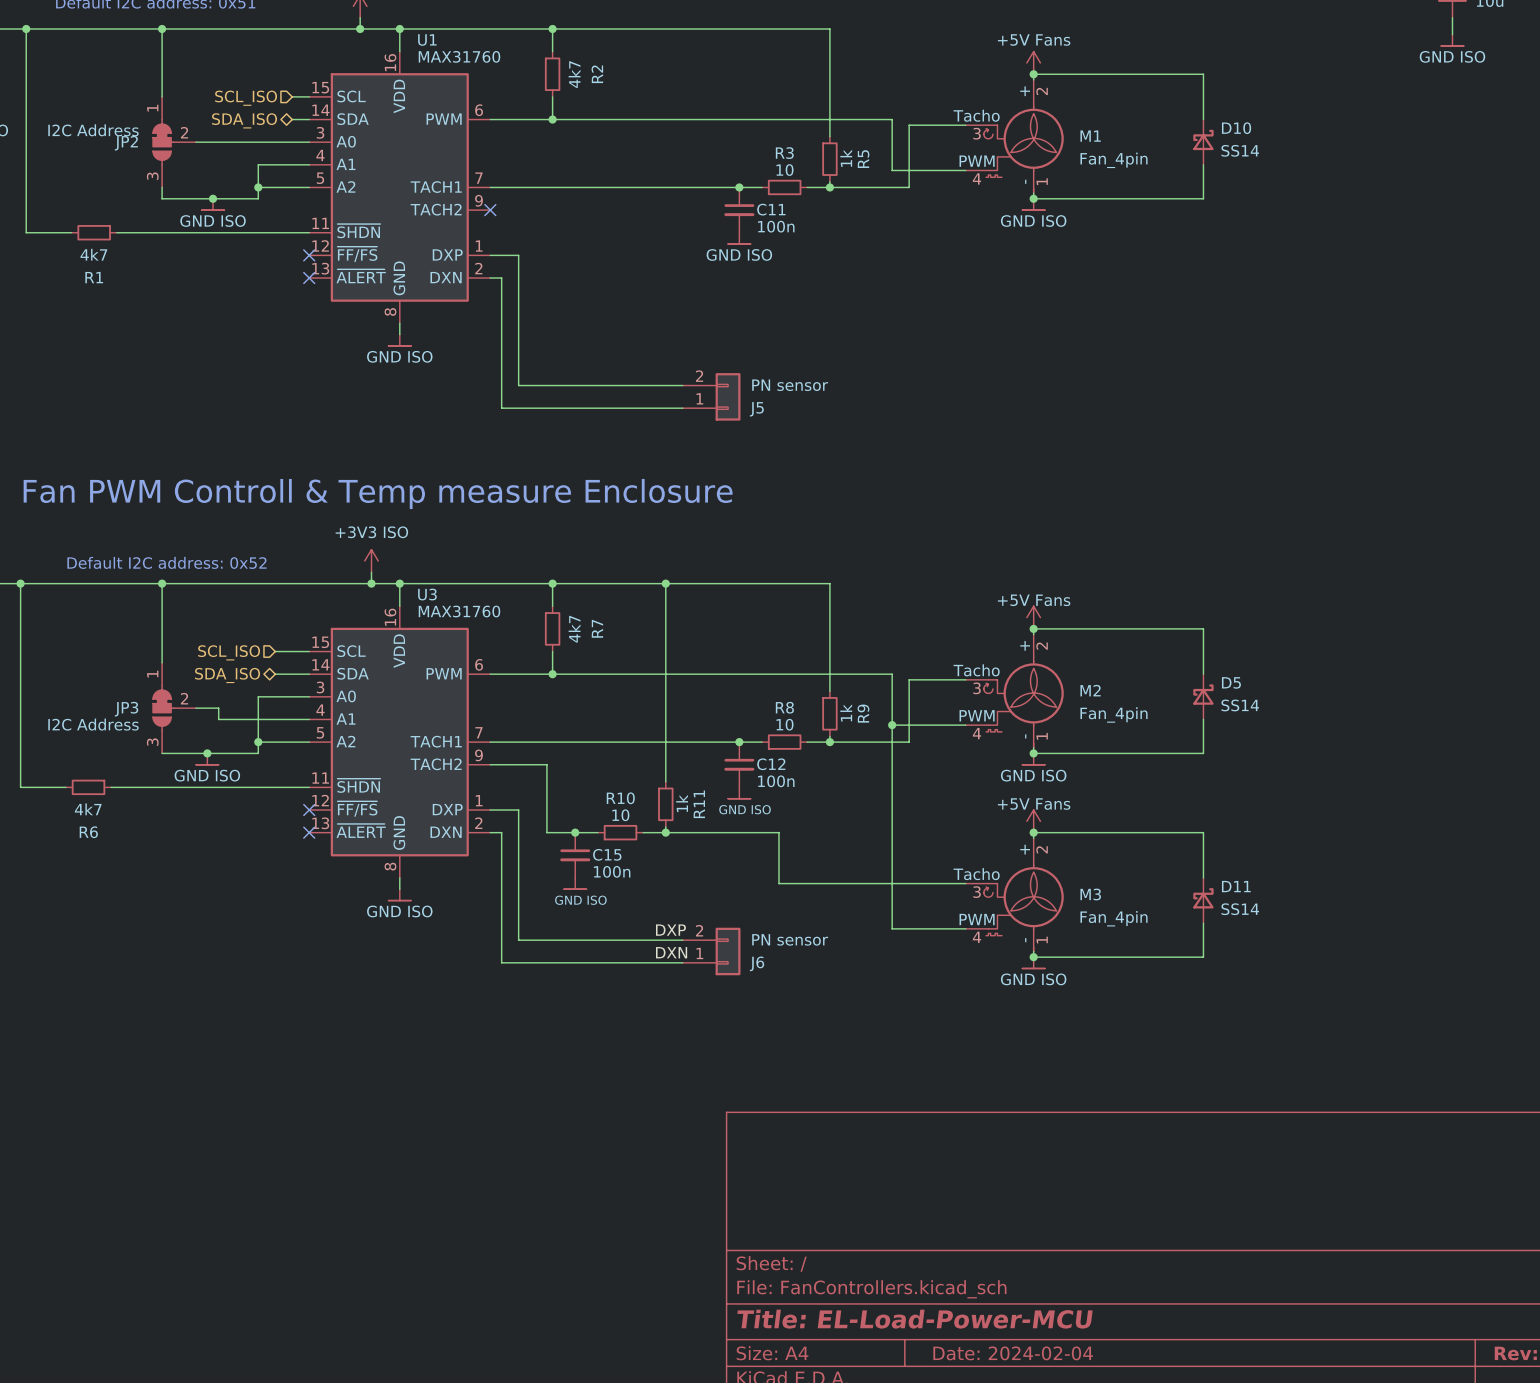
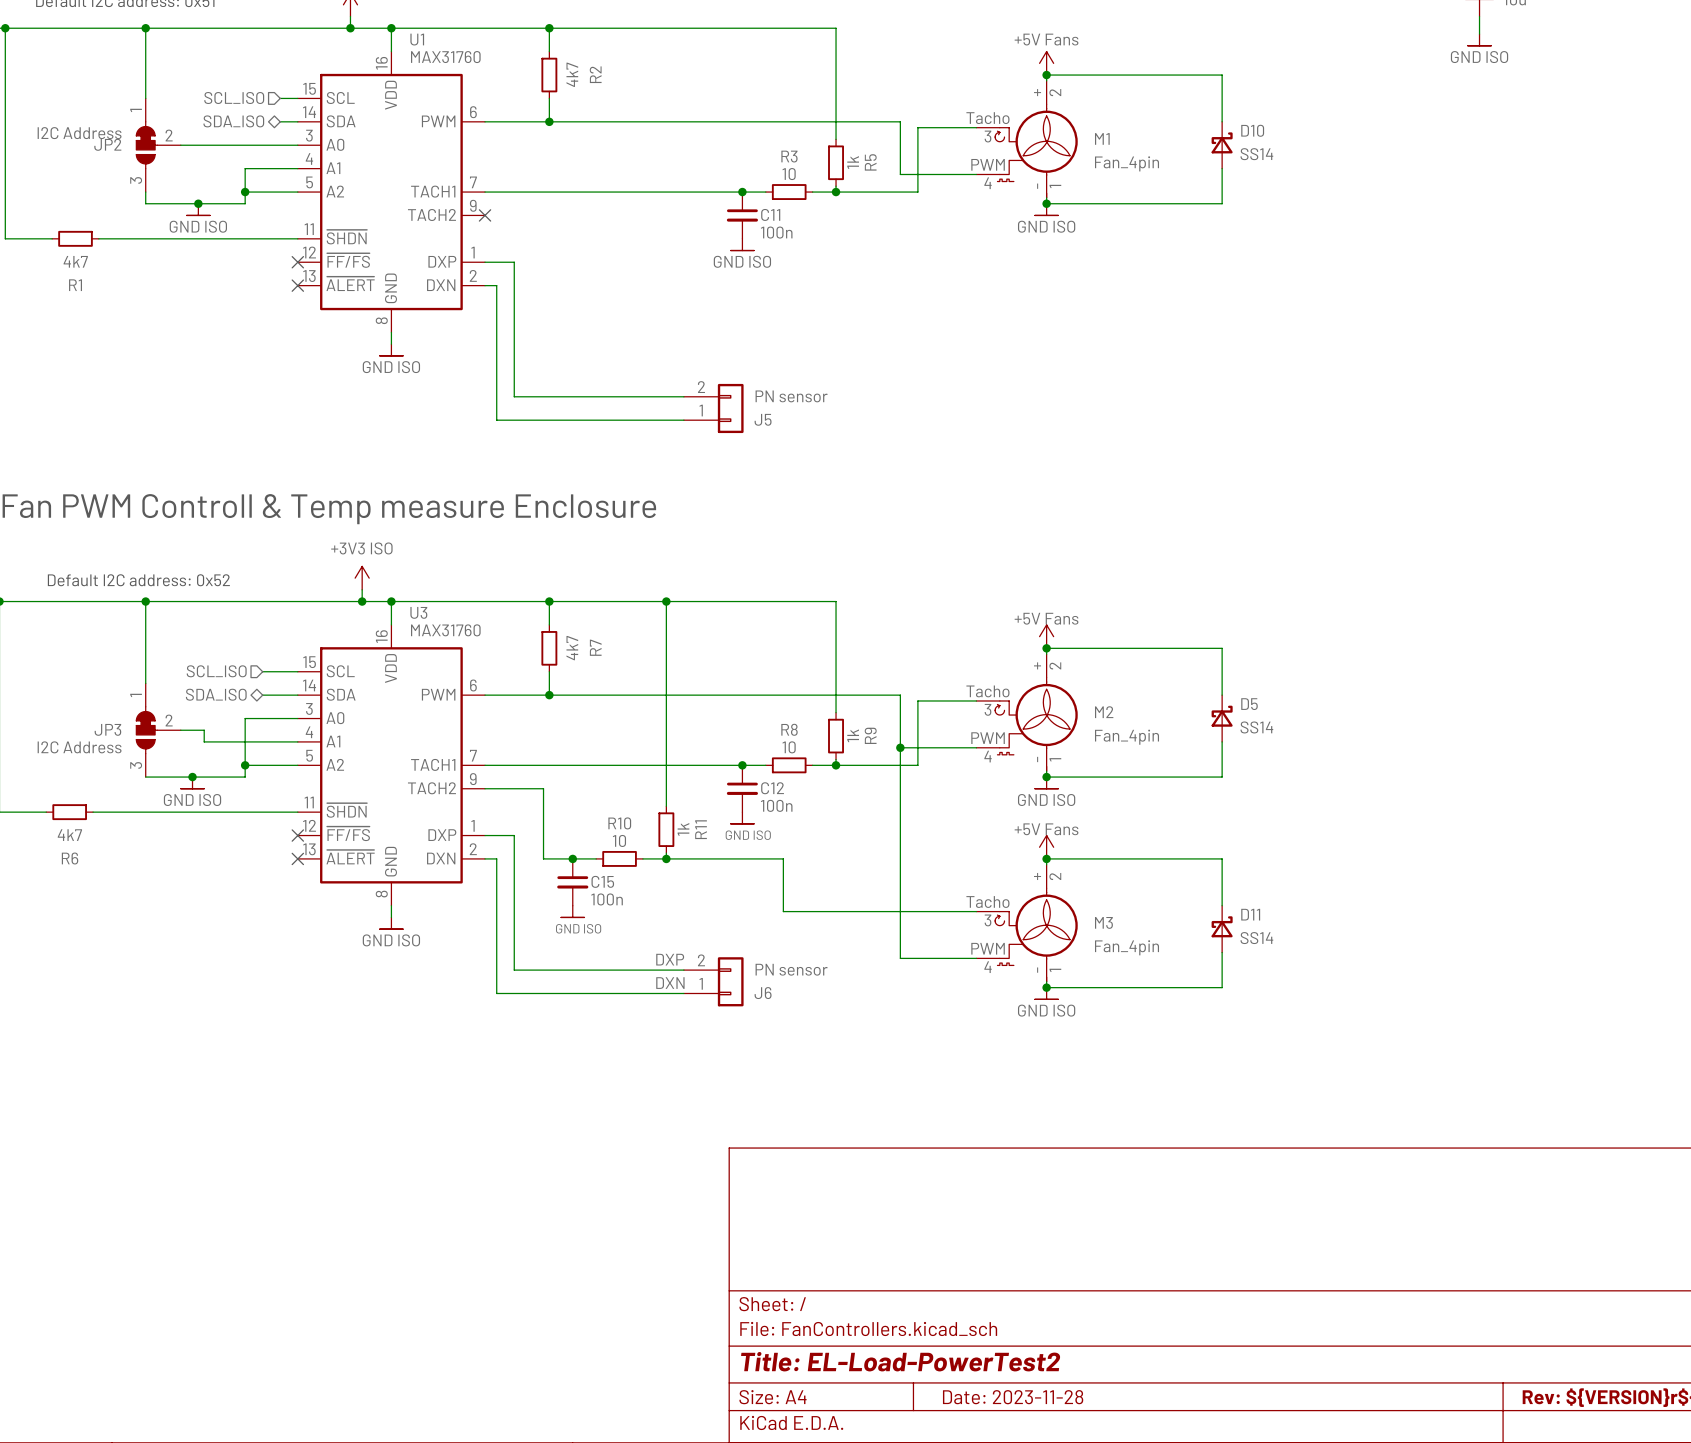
title block: Title: EL-Load-Power-MCU (915, 1319) -> Title: EL-Load-PowerTest2 (900, 1361)
title block: Date: 2024-02-04 (1013, 1353) -> Date: 2023-11-28 (1013, 1397)

